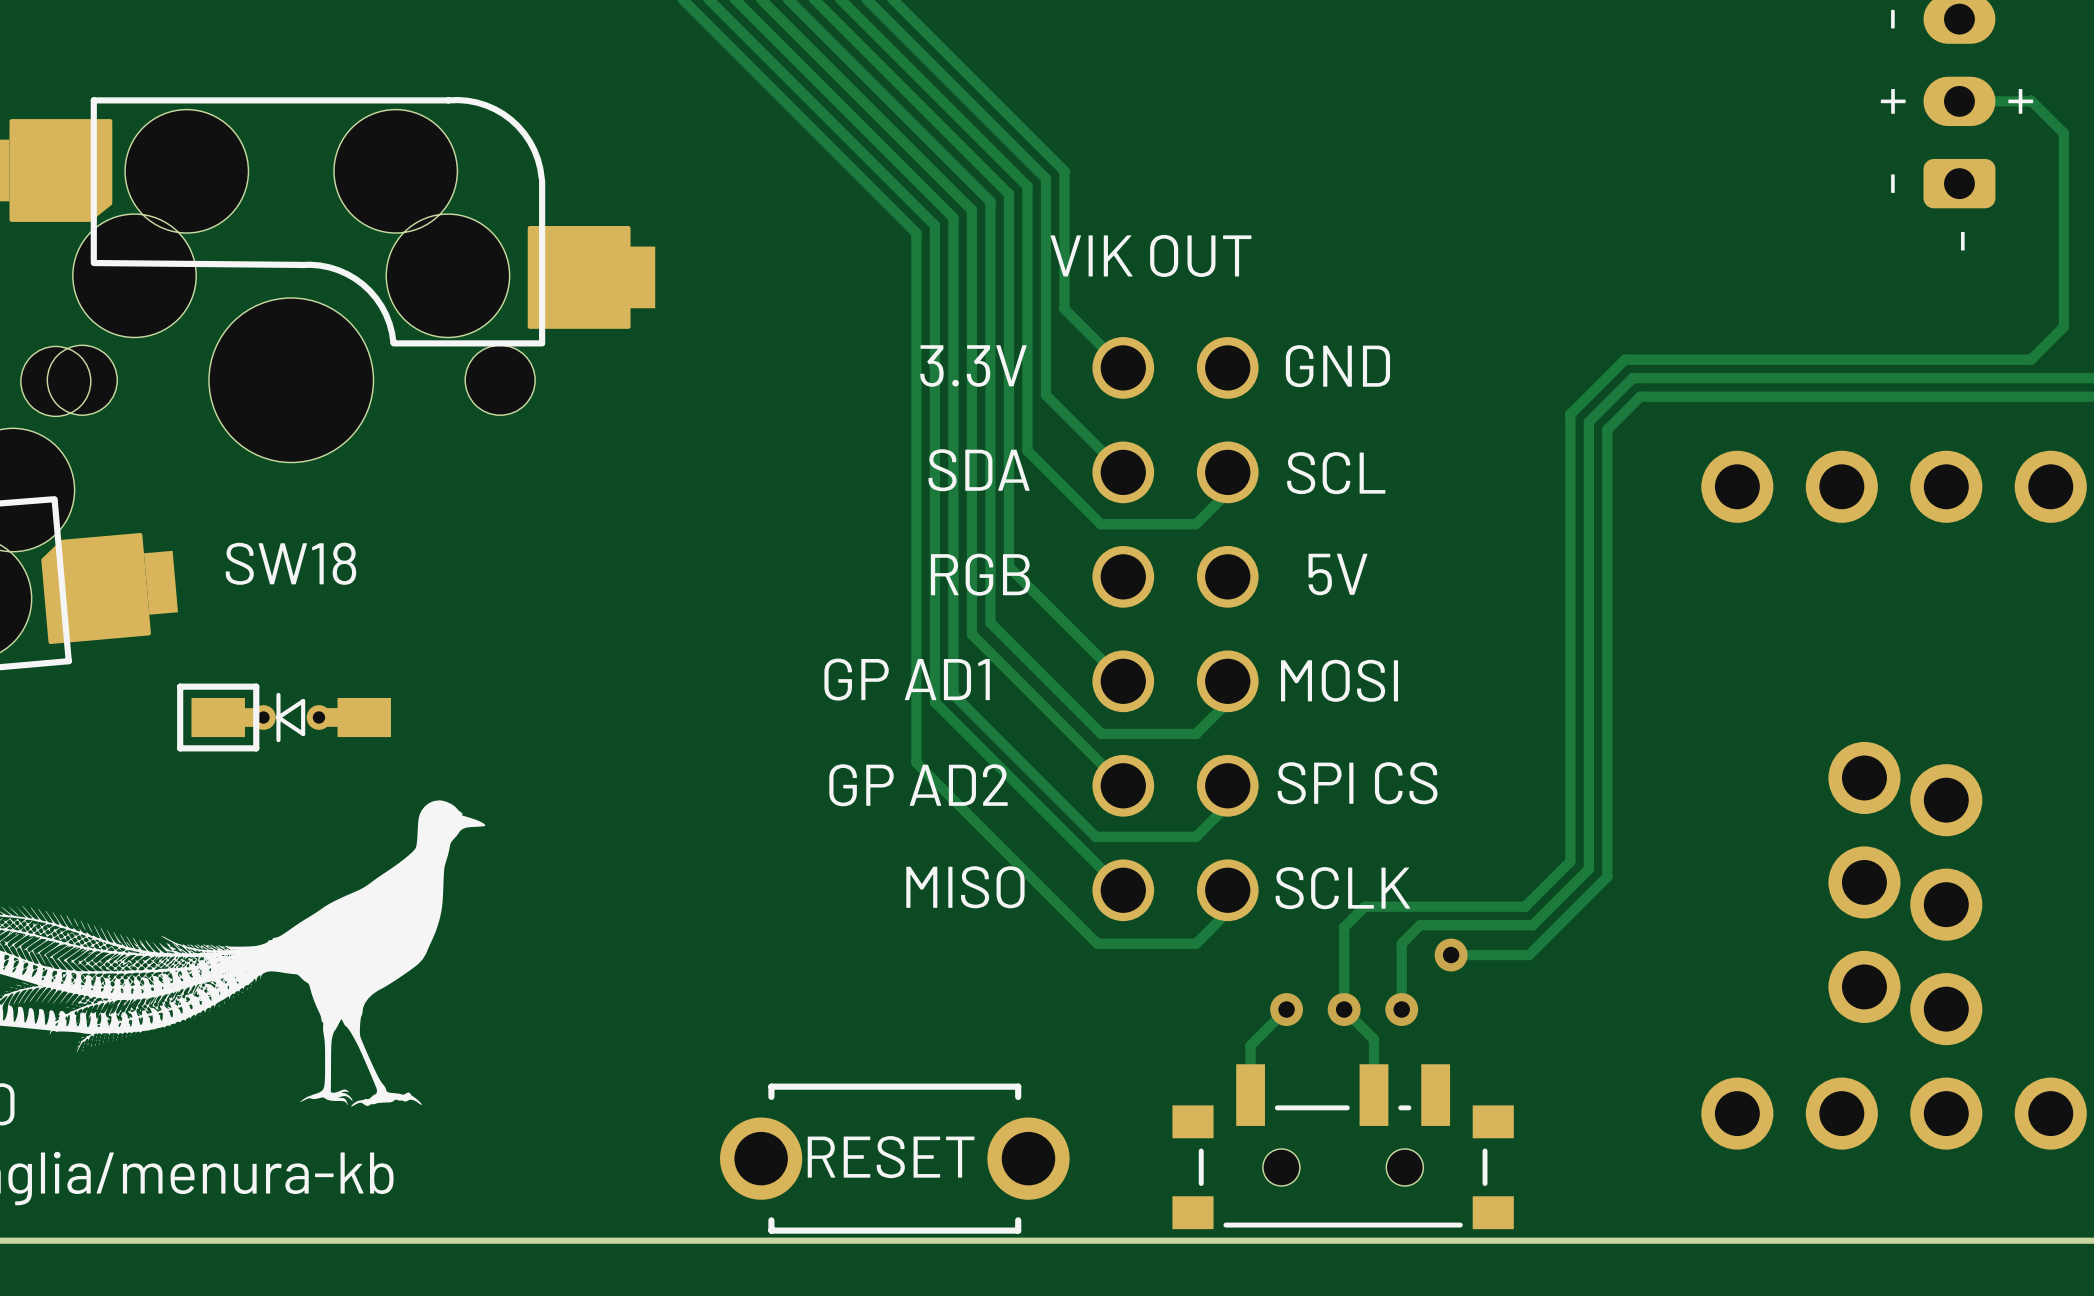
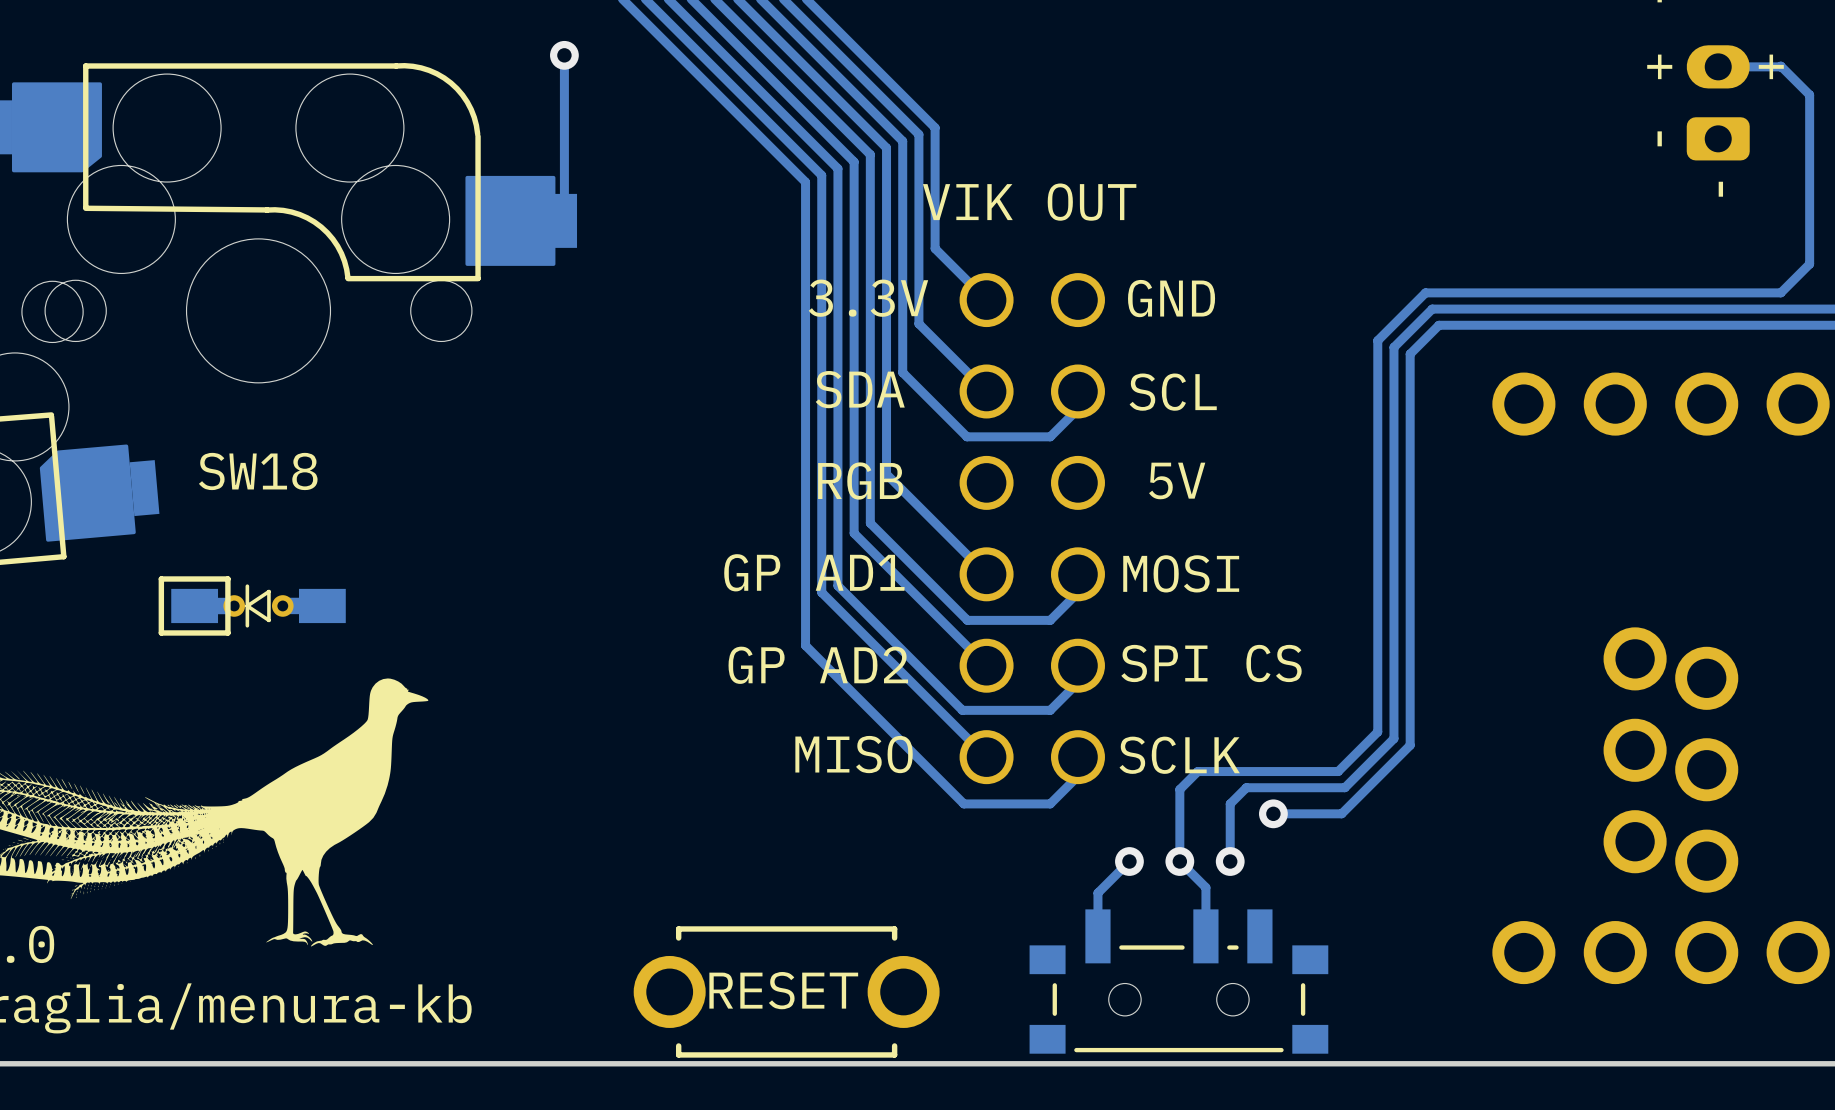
track: none -> (564, 55) (564, 220)
via: none -> (564, 55)

